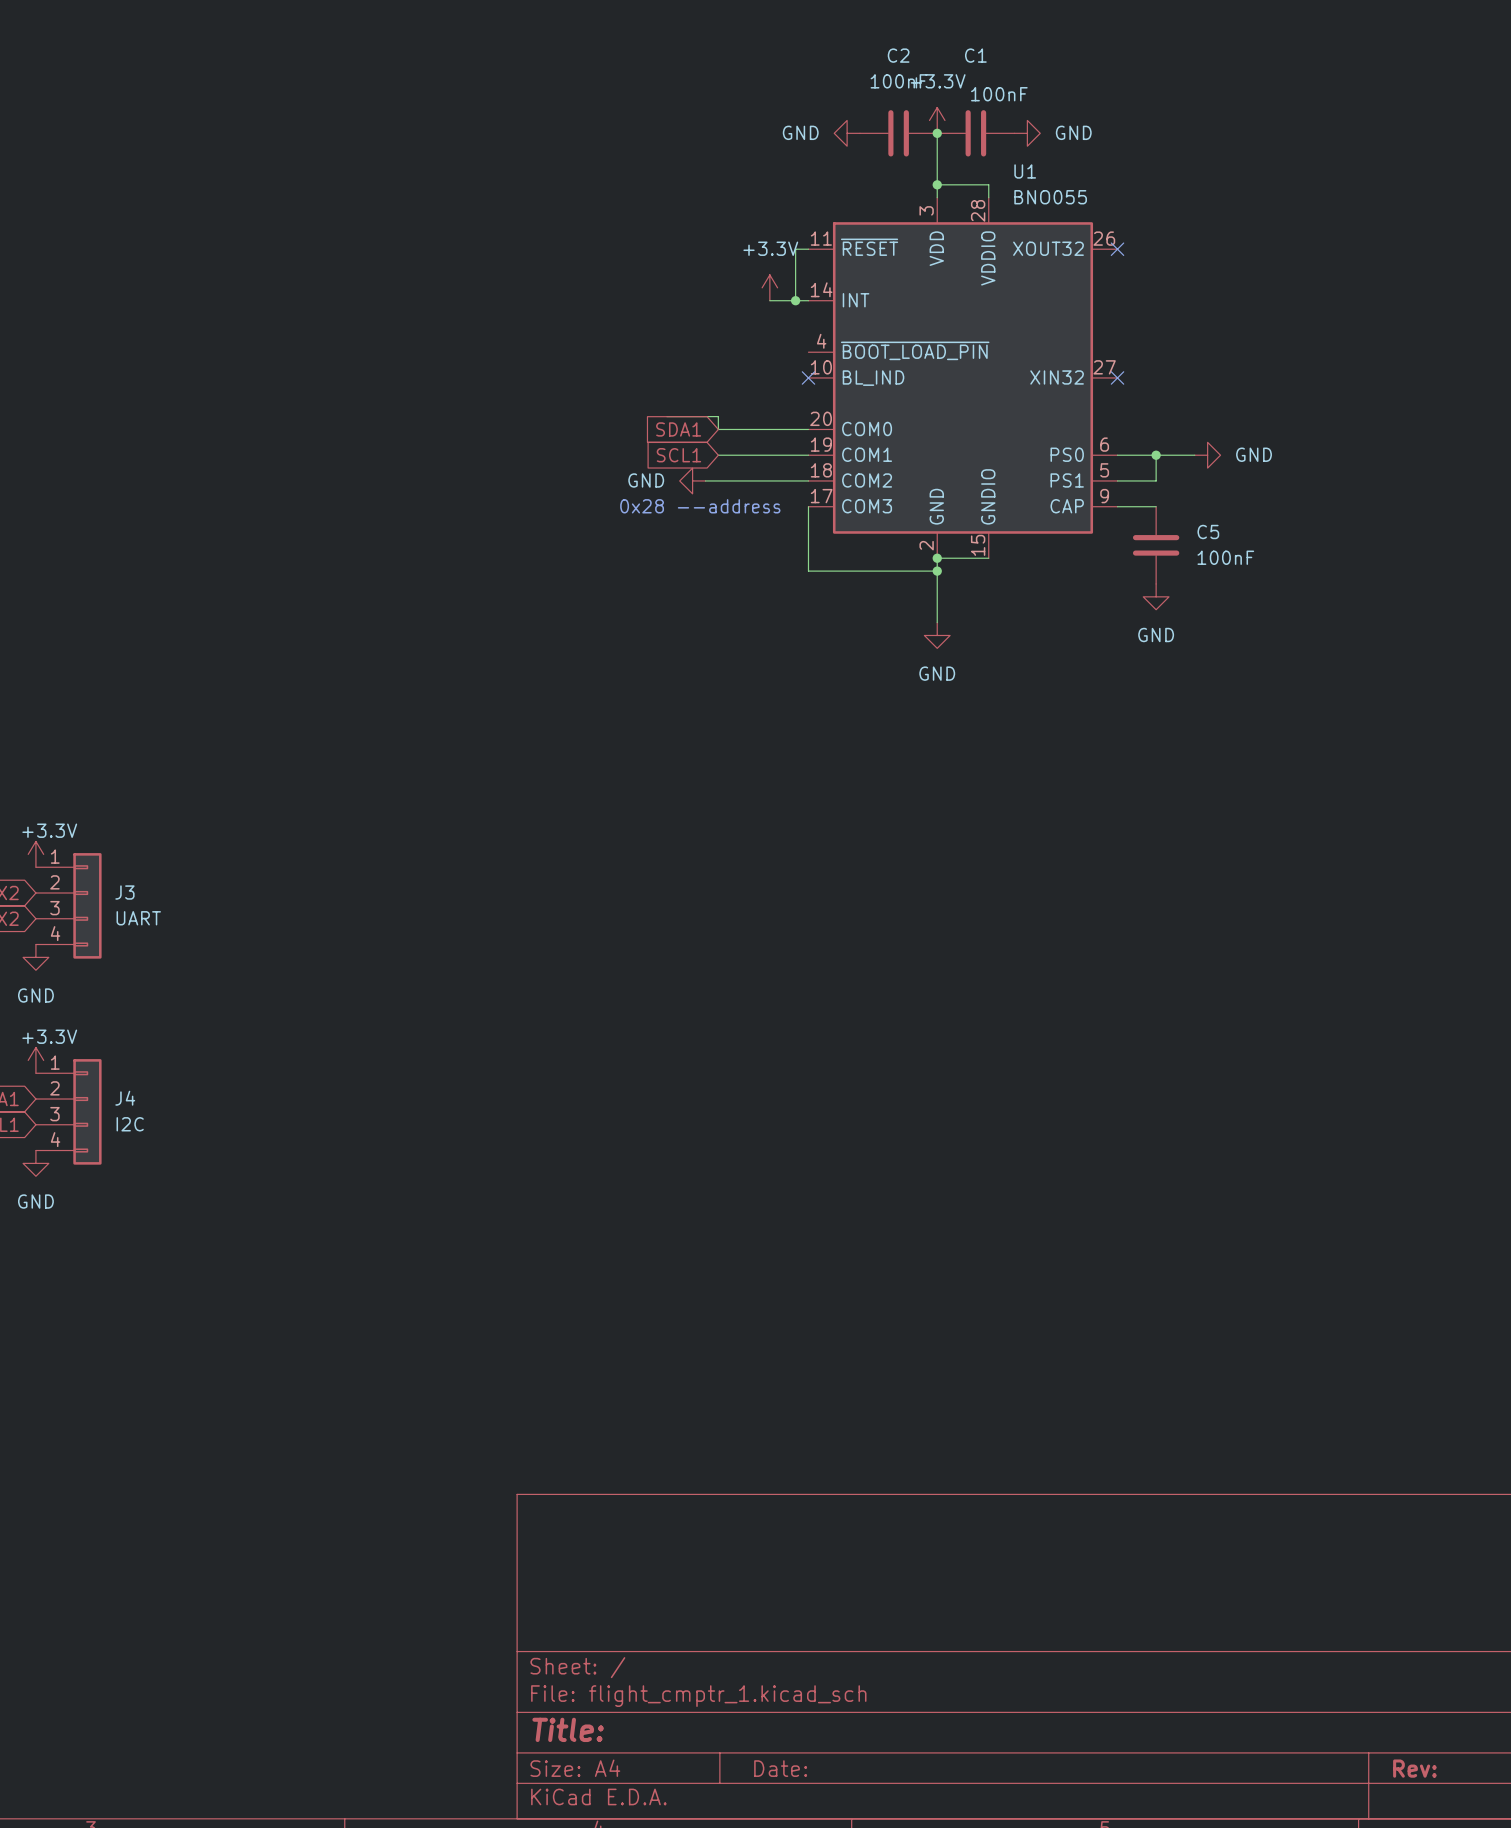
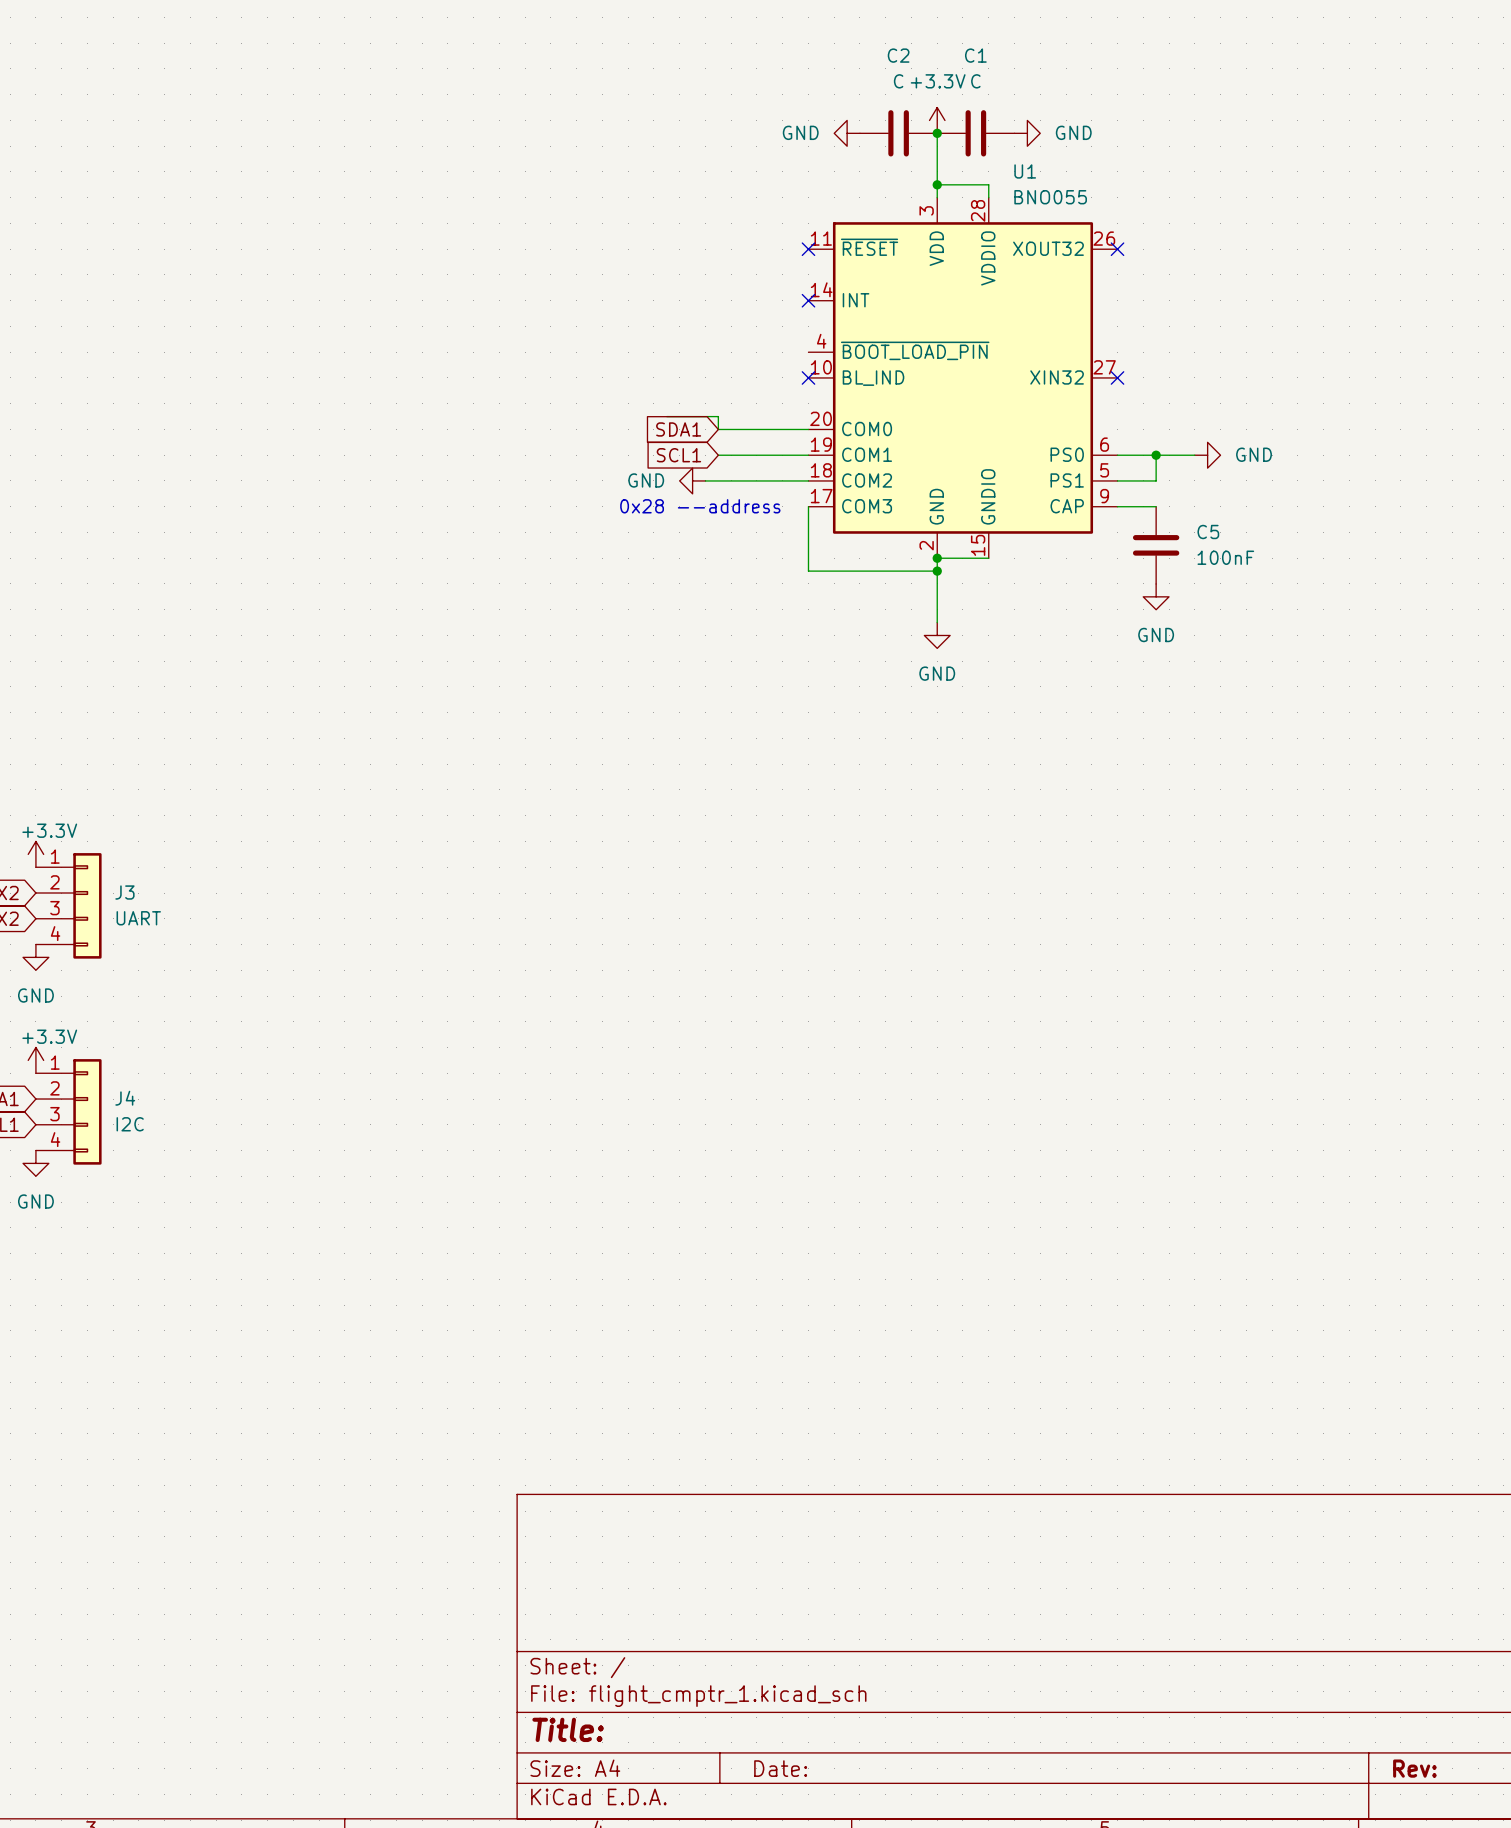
C2 value: 100nF (898, 81) -> C (898, 81)
C1 value: 100nF (999, 94) -> C (975, 81)
wire: (808, 249) (795, 249) (795, 300) -> none
no-connect mark: none -> (808, 249)
power symbol: +3.3V (769, 287) -> none
wire: (769, 300) (808, 300) -> none
junction: (795, 300) -> none
no-connect mark: none -> (808, 300)

